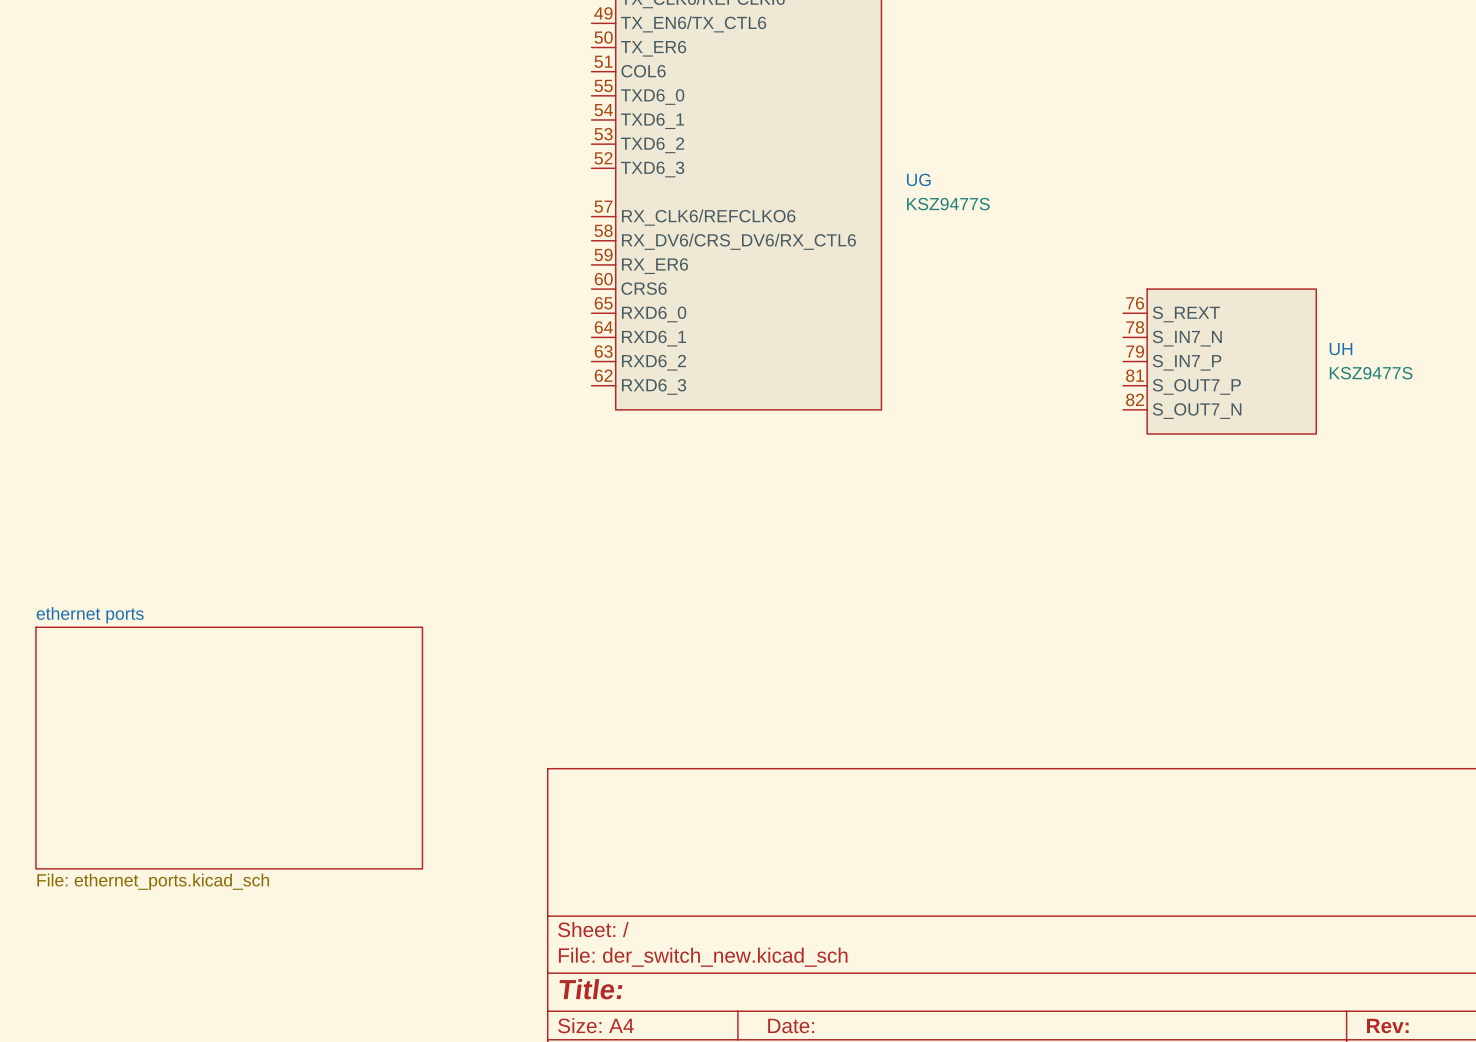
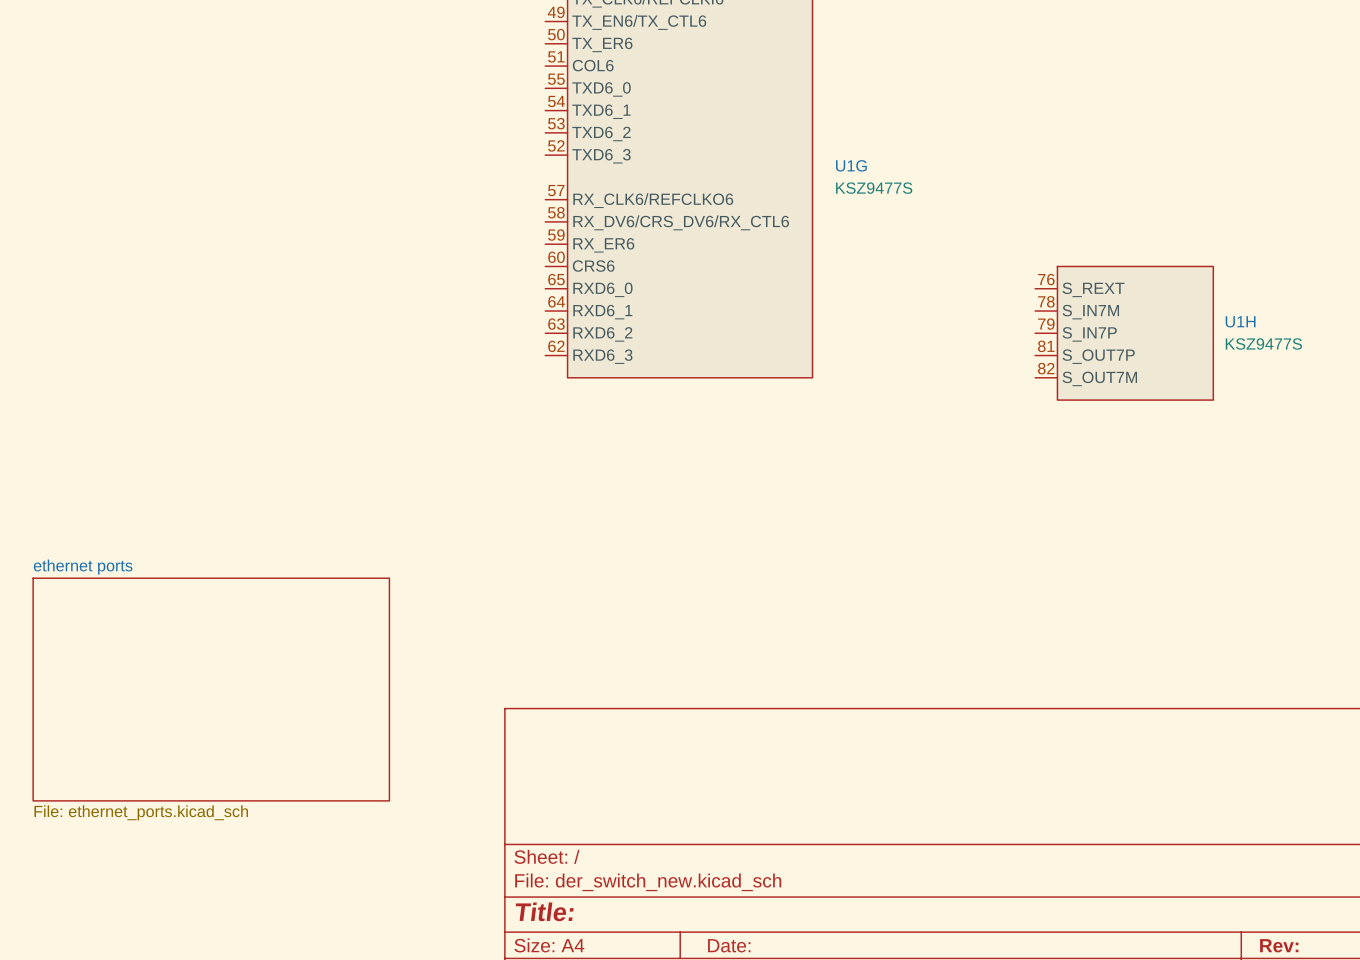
UG name: UG (918, 179) -> U1G (851, 165)
UH pin name: S_IN7_N (1187, 338) -> S_IN7M (1090, 312)
UH name: UH (1340, 349) -> U1H (1240, 321)
UH pin name: S_IN7_P (1187, 362) -> S_IN7P (1089, 334)
UH pin name: S_OUT7_P (1196, 386) -> S_OUT7P (1098, 356)
UH pin name: S_OUT7_N (1197, 411) -> S_OUT7M (1099, 378)

